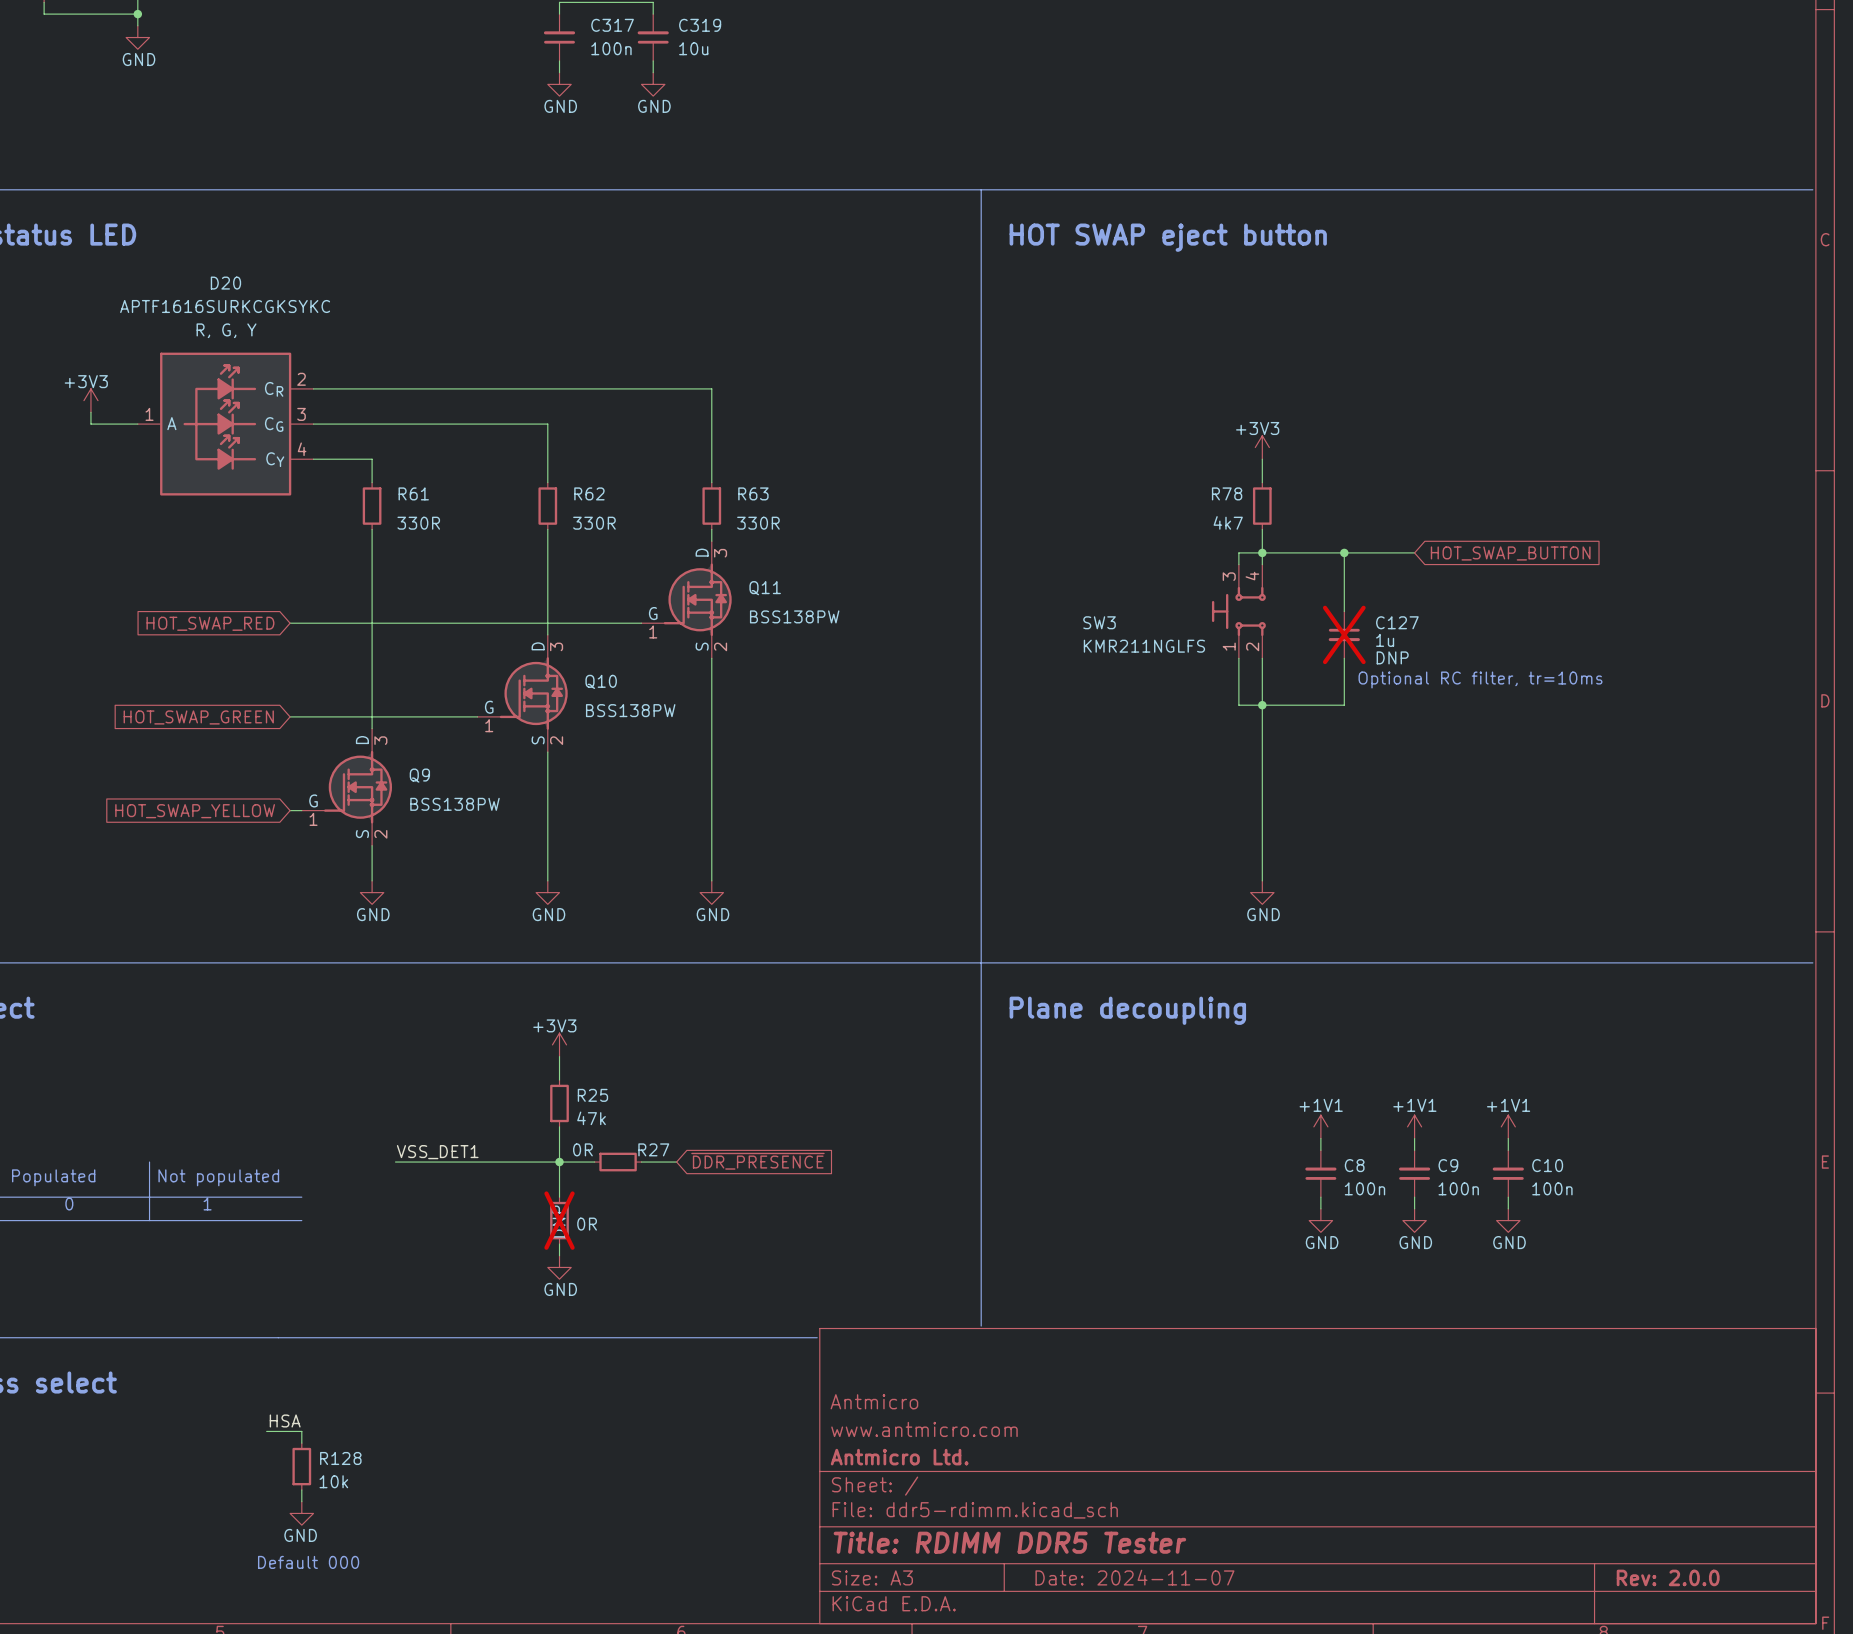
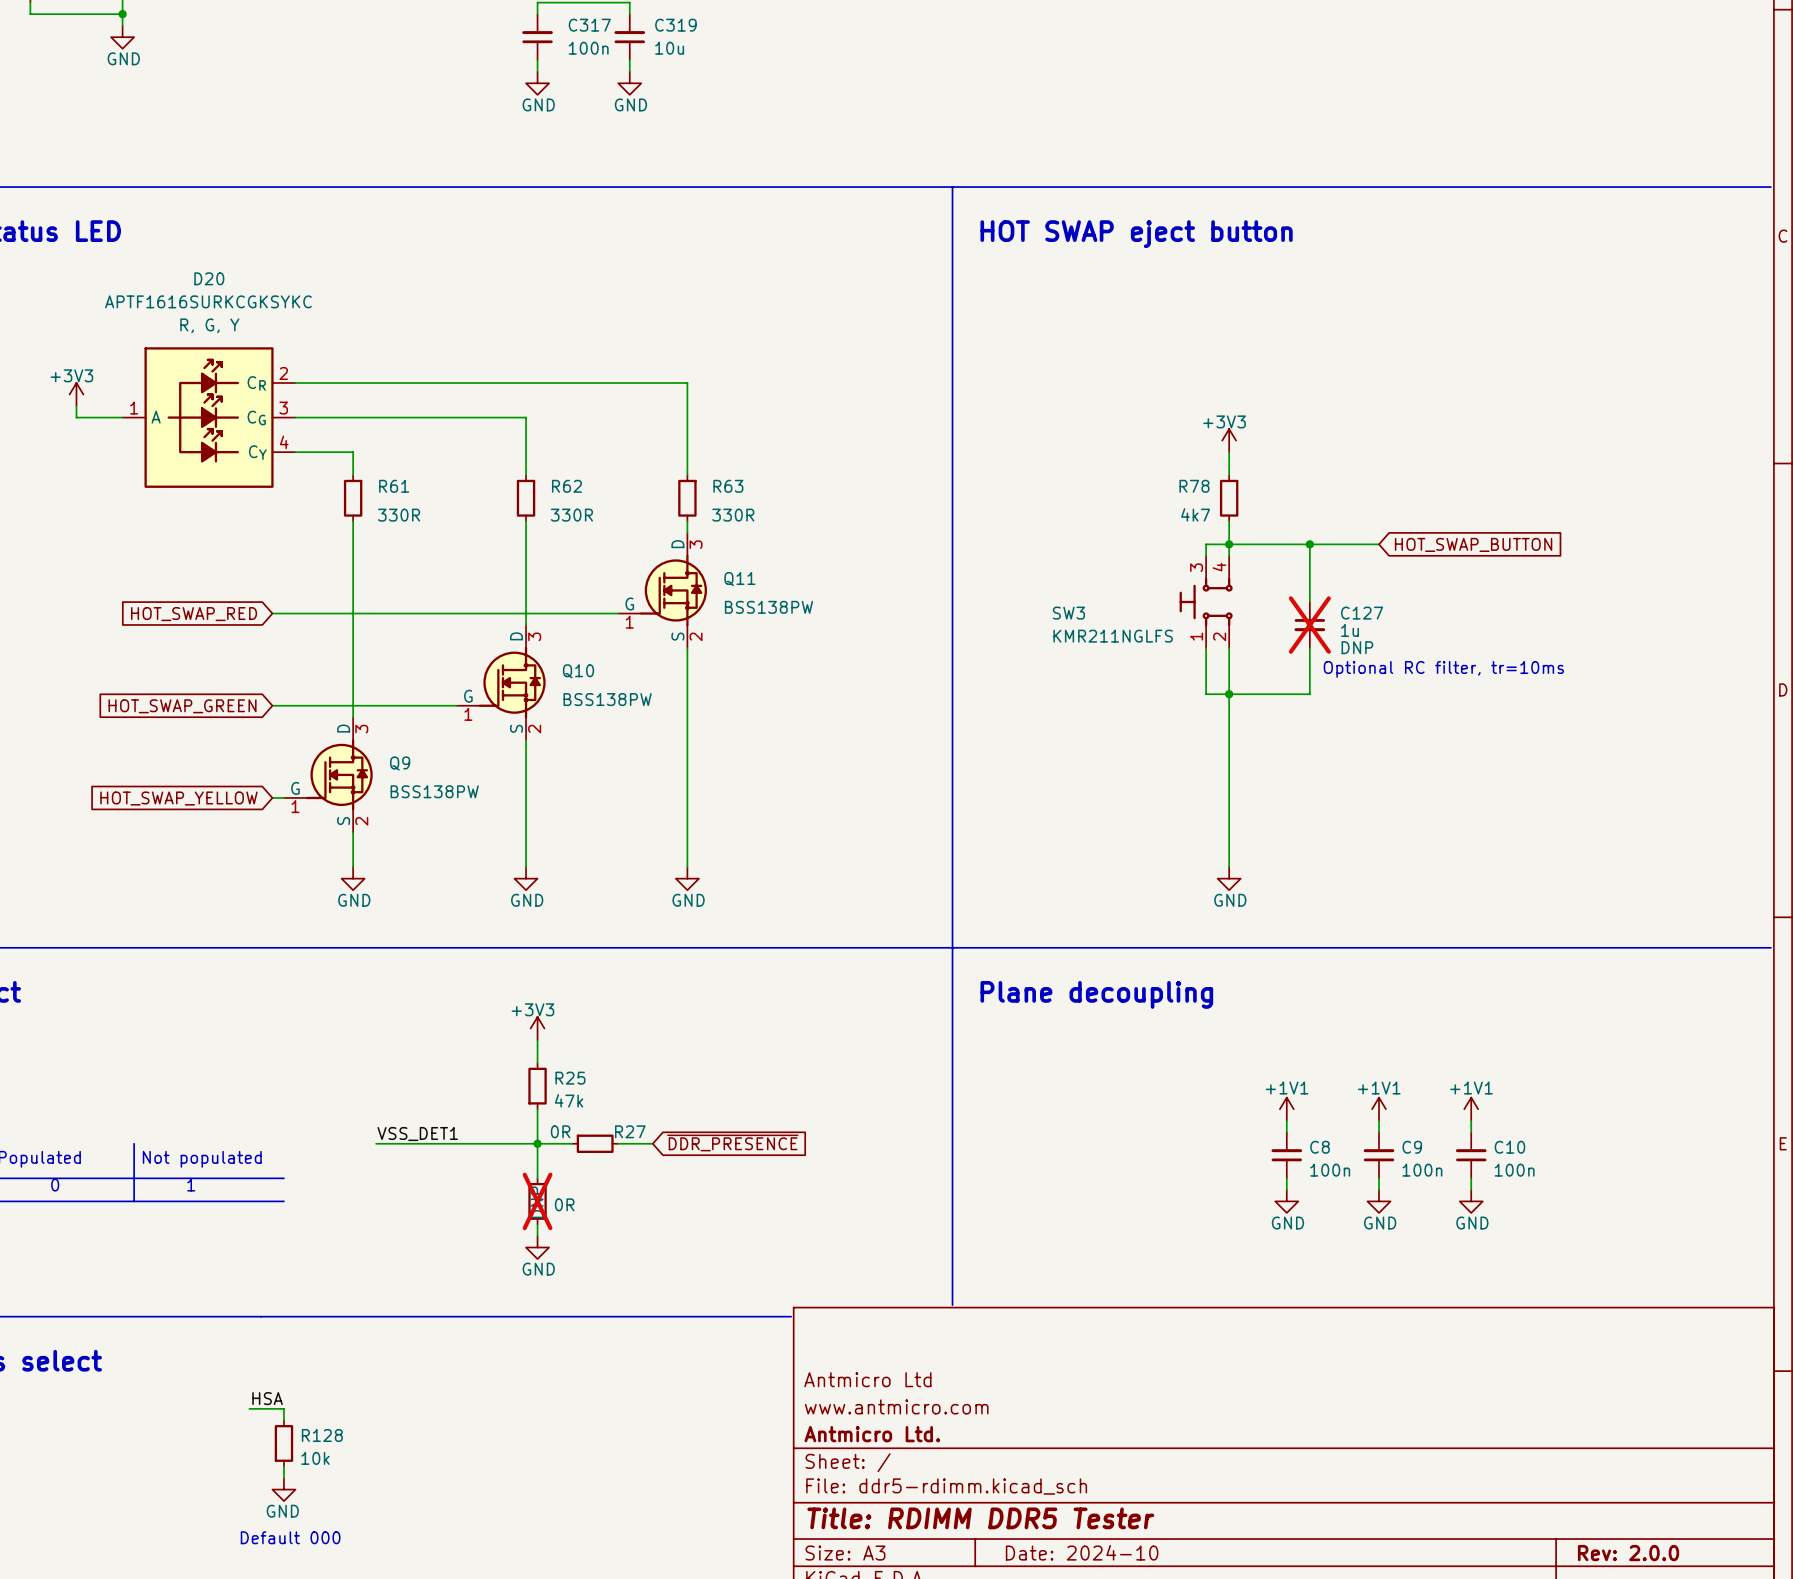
title block: Antmicro (874, 1401) -> Antmicro Ltd (867, 1379)
title block: Date: 2024-11-07 (1134, 1577) -> Date: 2024-10 (1082, 1552)

